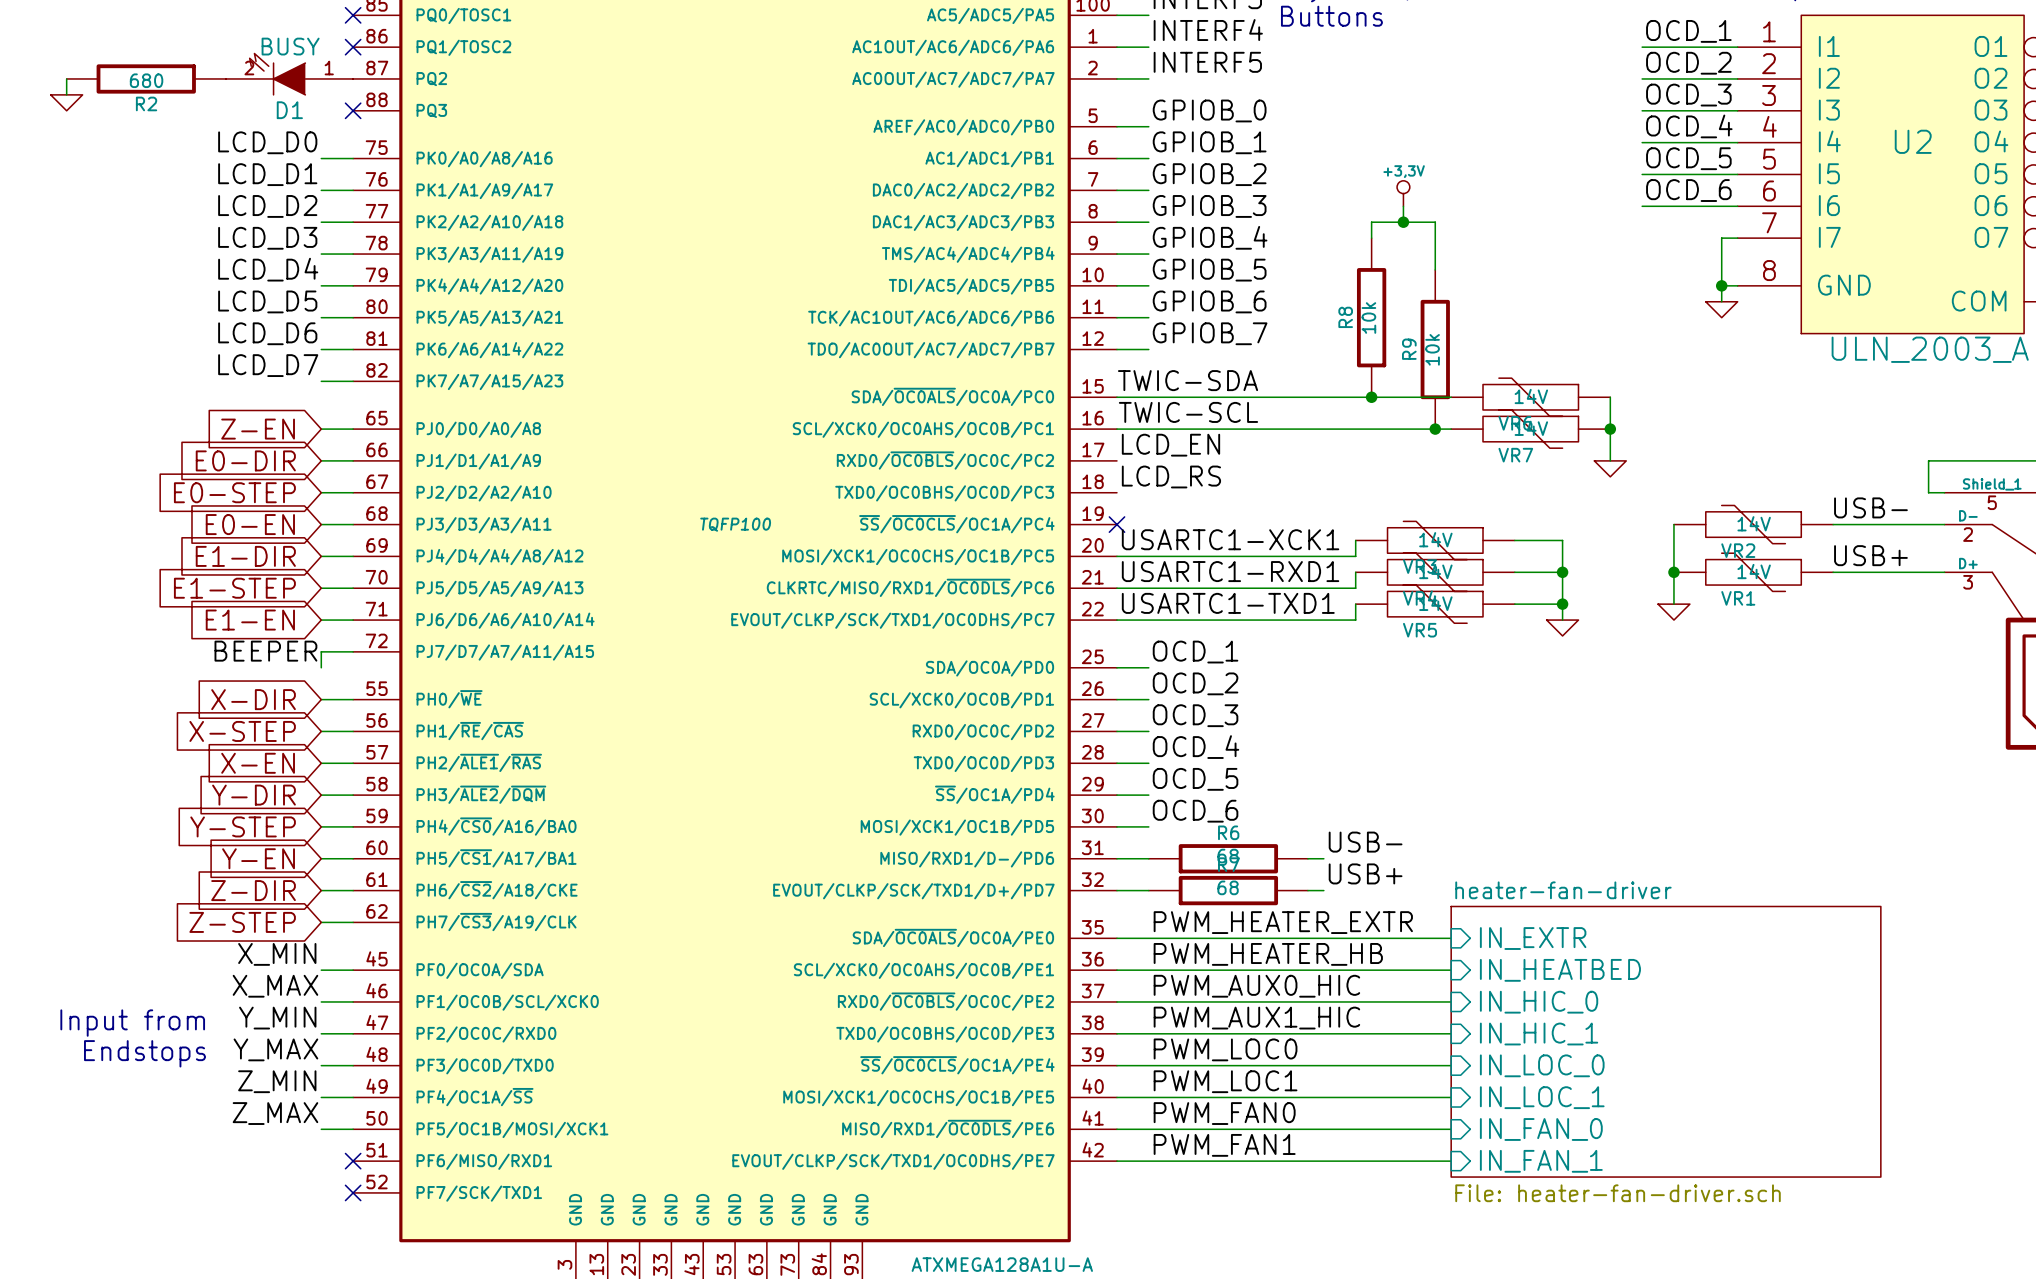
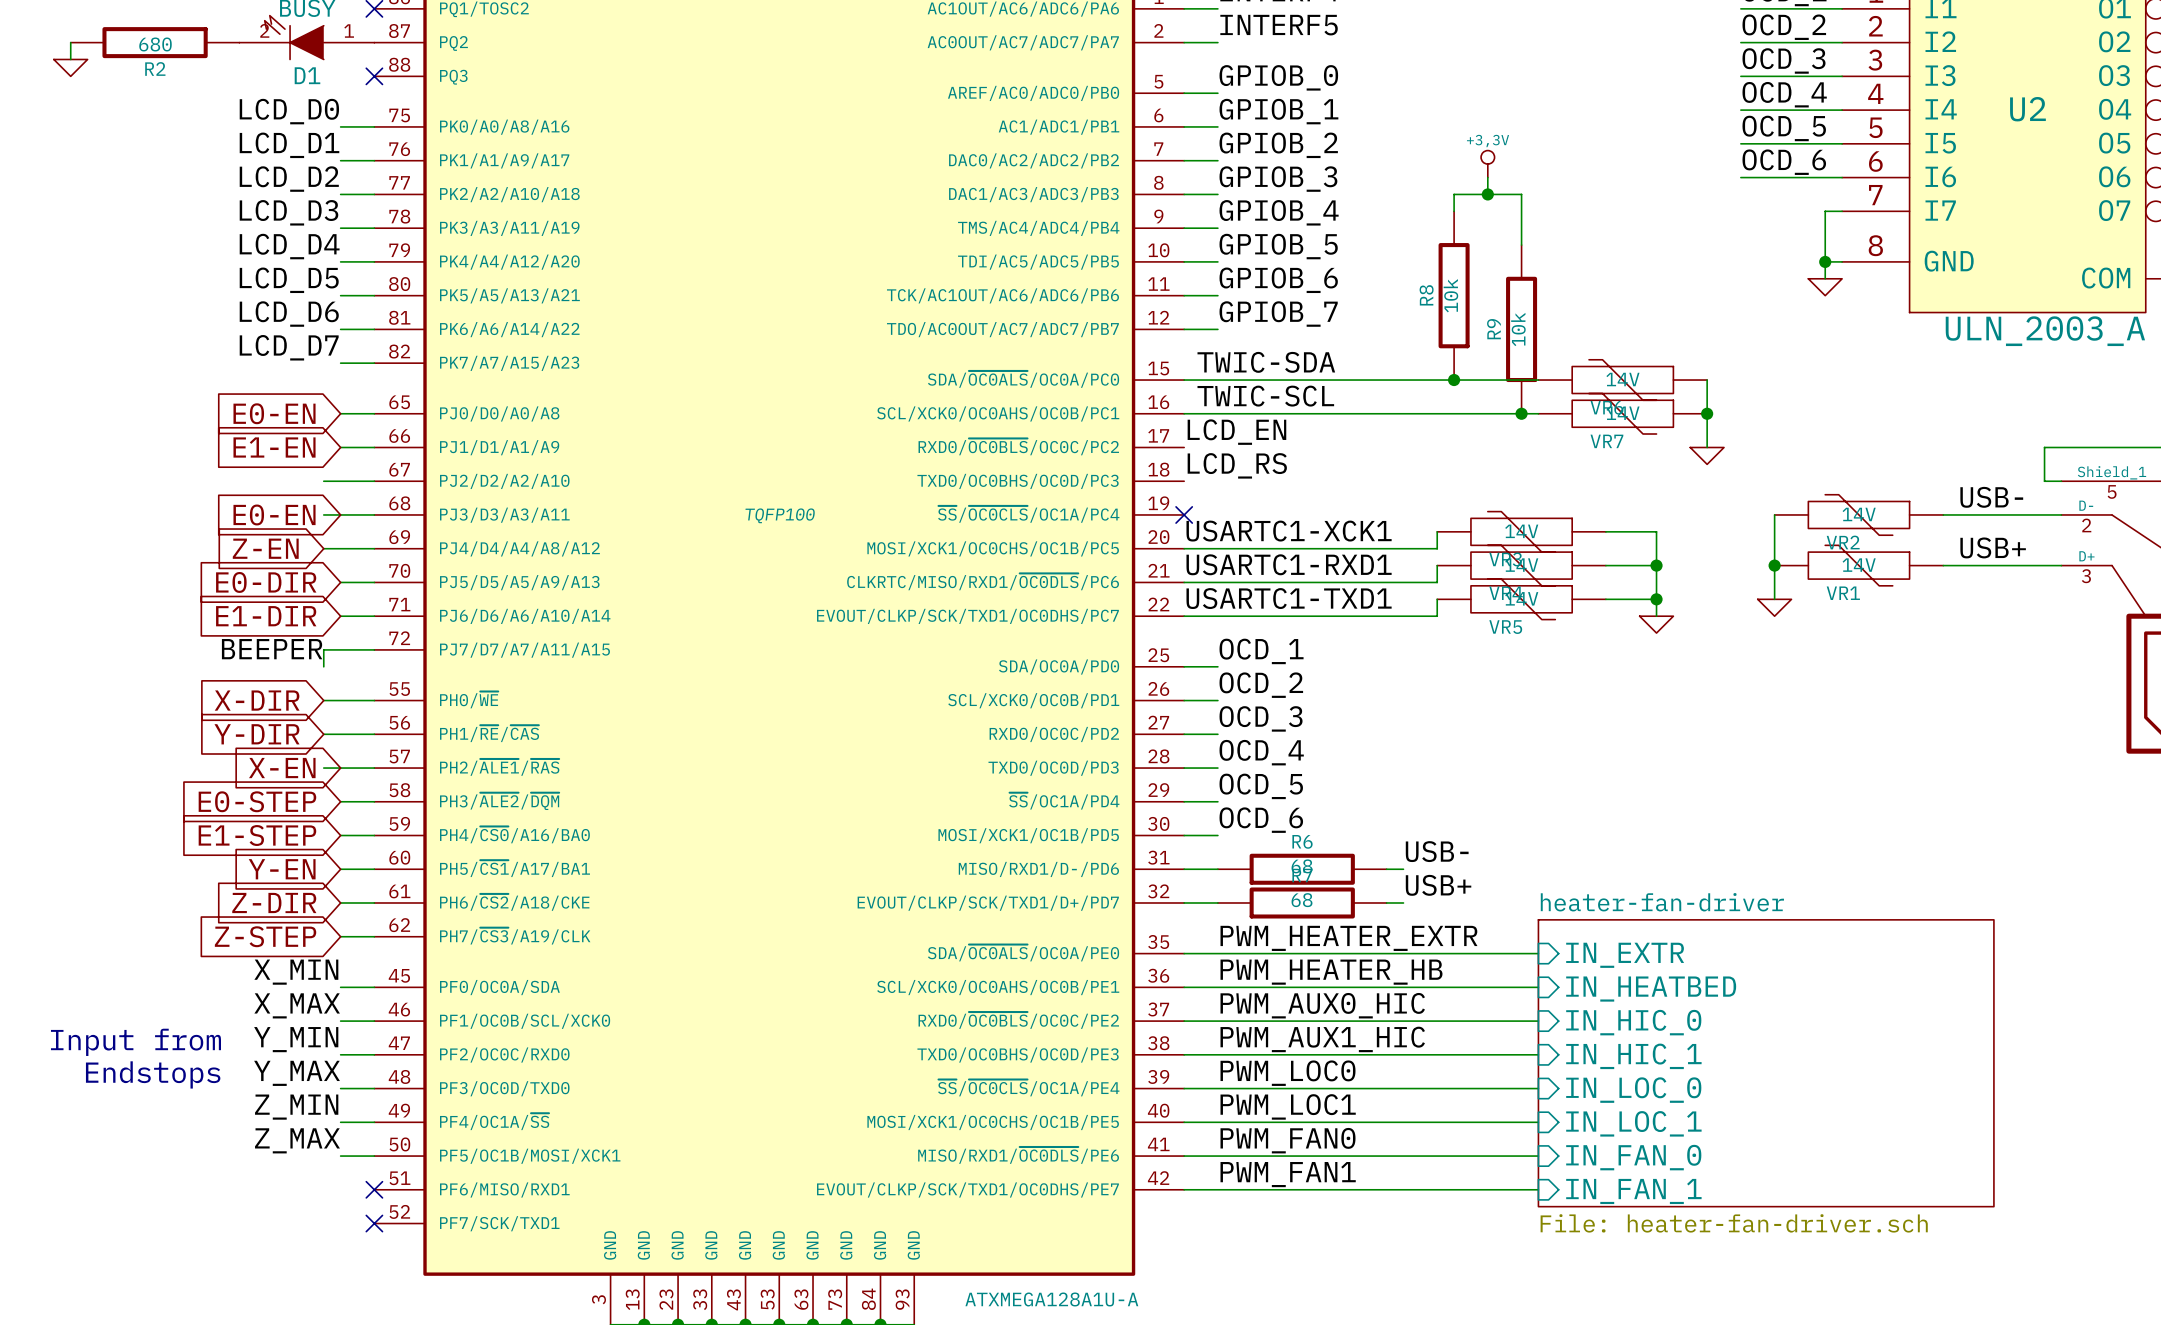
global label: Z-EN (258, 429) -> E0-EN (274, 413)
global label: E0-DIR (245, 460) -> E1-EN (274, 447)
global label: E0-STEP (234, 492) -> none
wire: none -> (323, 481) (340, 481)
wire: none -> (323, 514) (340, 514)
global label: none -> Z-EN (265, 548)
global label: E1-DIR (245, 556) -> none
wire: none -> (323, 548) (340, 548)
global label: E1-STEP (234, 588) -> E0-DIR (266, 582)
global label: E1-EN (250, 620) -> E1-DIR (266, 616)
label position: BEEPER (265, 651) -> BEEPER (272, 649)
wire: (321, 651) (321, 667) -> (340, 649) (323, 649) (323, 666)
global label position: X-DIR (253, 699) -> X-DIR (257, 700)
wire: none -> (323, 700) (340, 700)
global label: none -> Y-DIR (257, 734)
global label: X-STEP (242, 731) -> none
wire: none -> (323, 734) (340, 734)
wire: none -> (323, 768) (340, 768)
global label: Y-DIR (253, 795) -> E0-STEP (257, 801)
global label: Y-STEP (243, 826) -> E1-STEP (257, 835)

